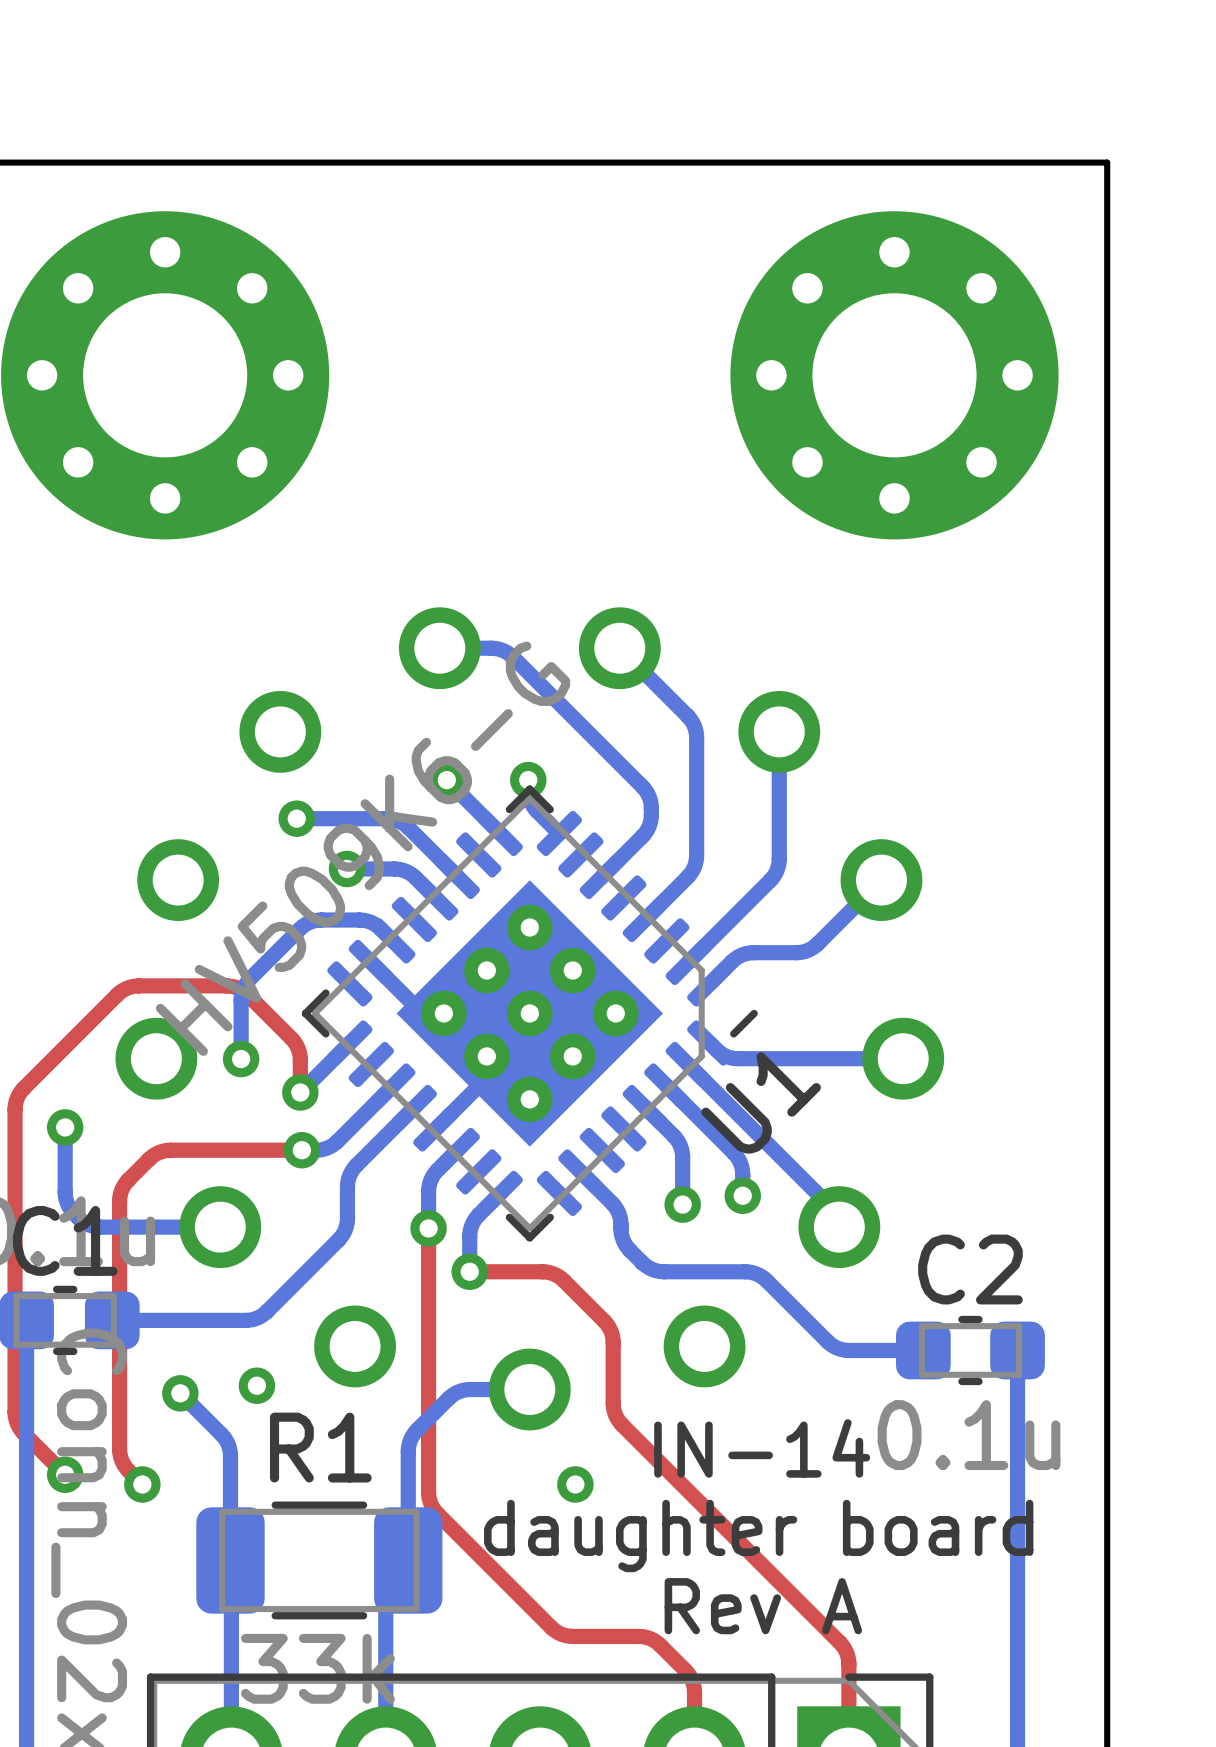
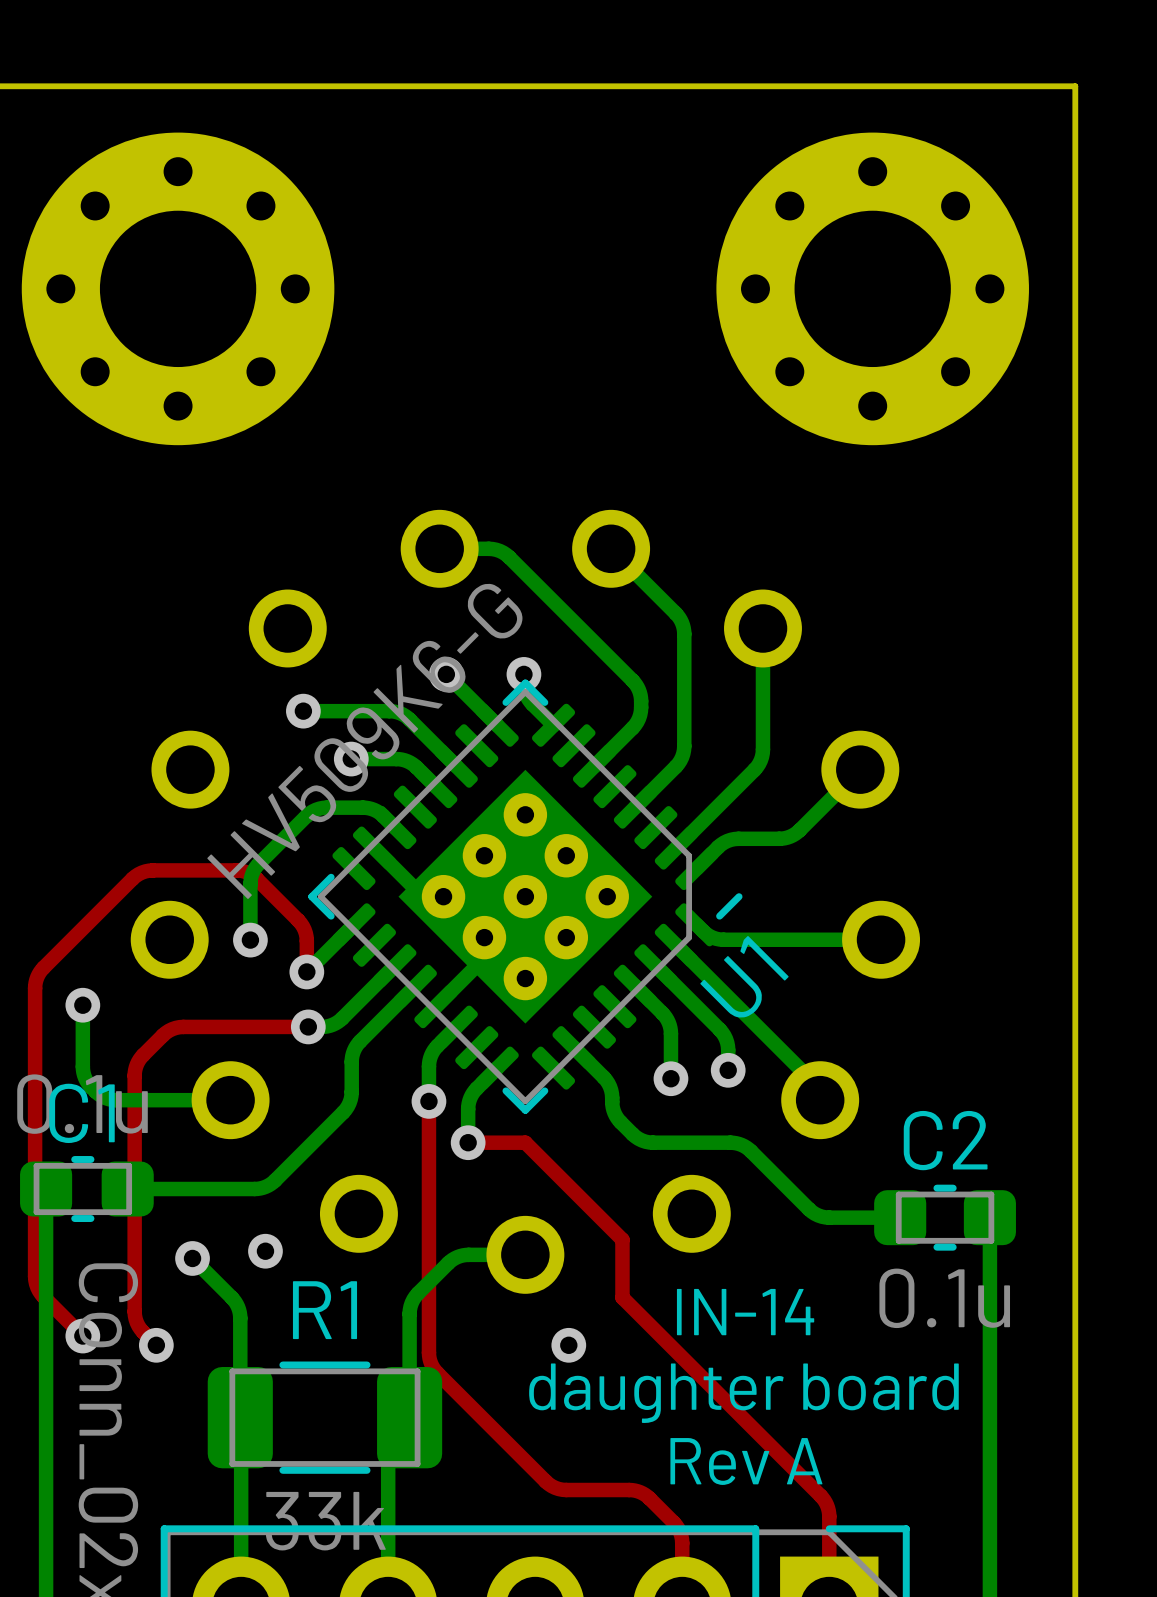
top track: (529, 1271) (550, 1272) (560, 1278) (608, 1325) (613, 1339) (614, 1411) (619, 1421) (631, 1434) -> (525, 1142) (622, 1239) (622, 1297)

